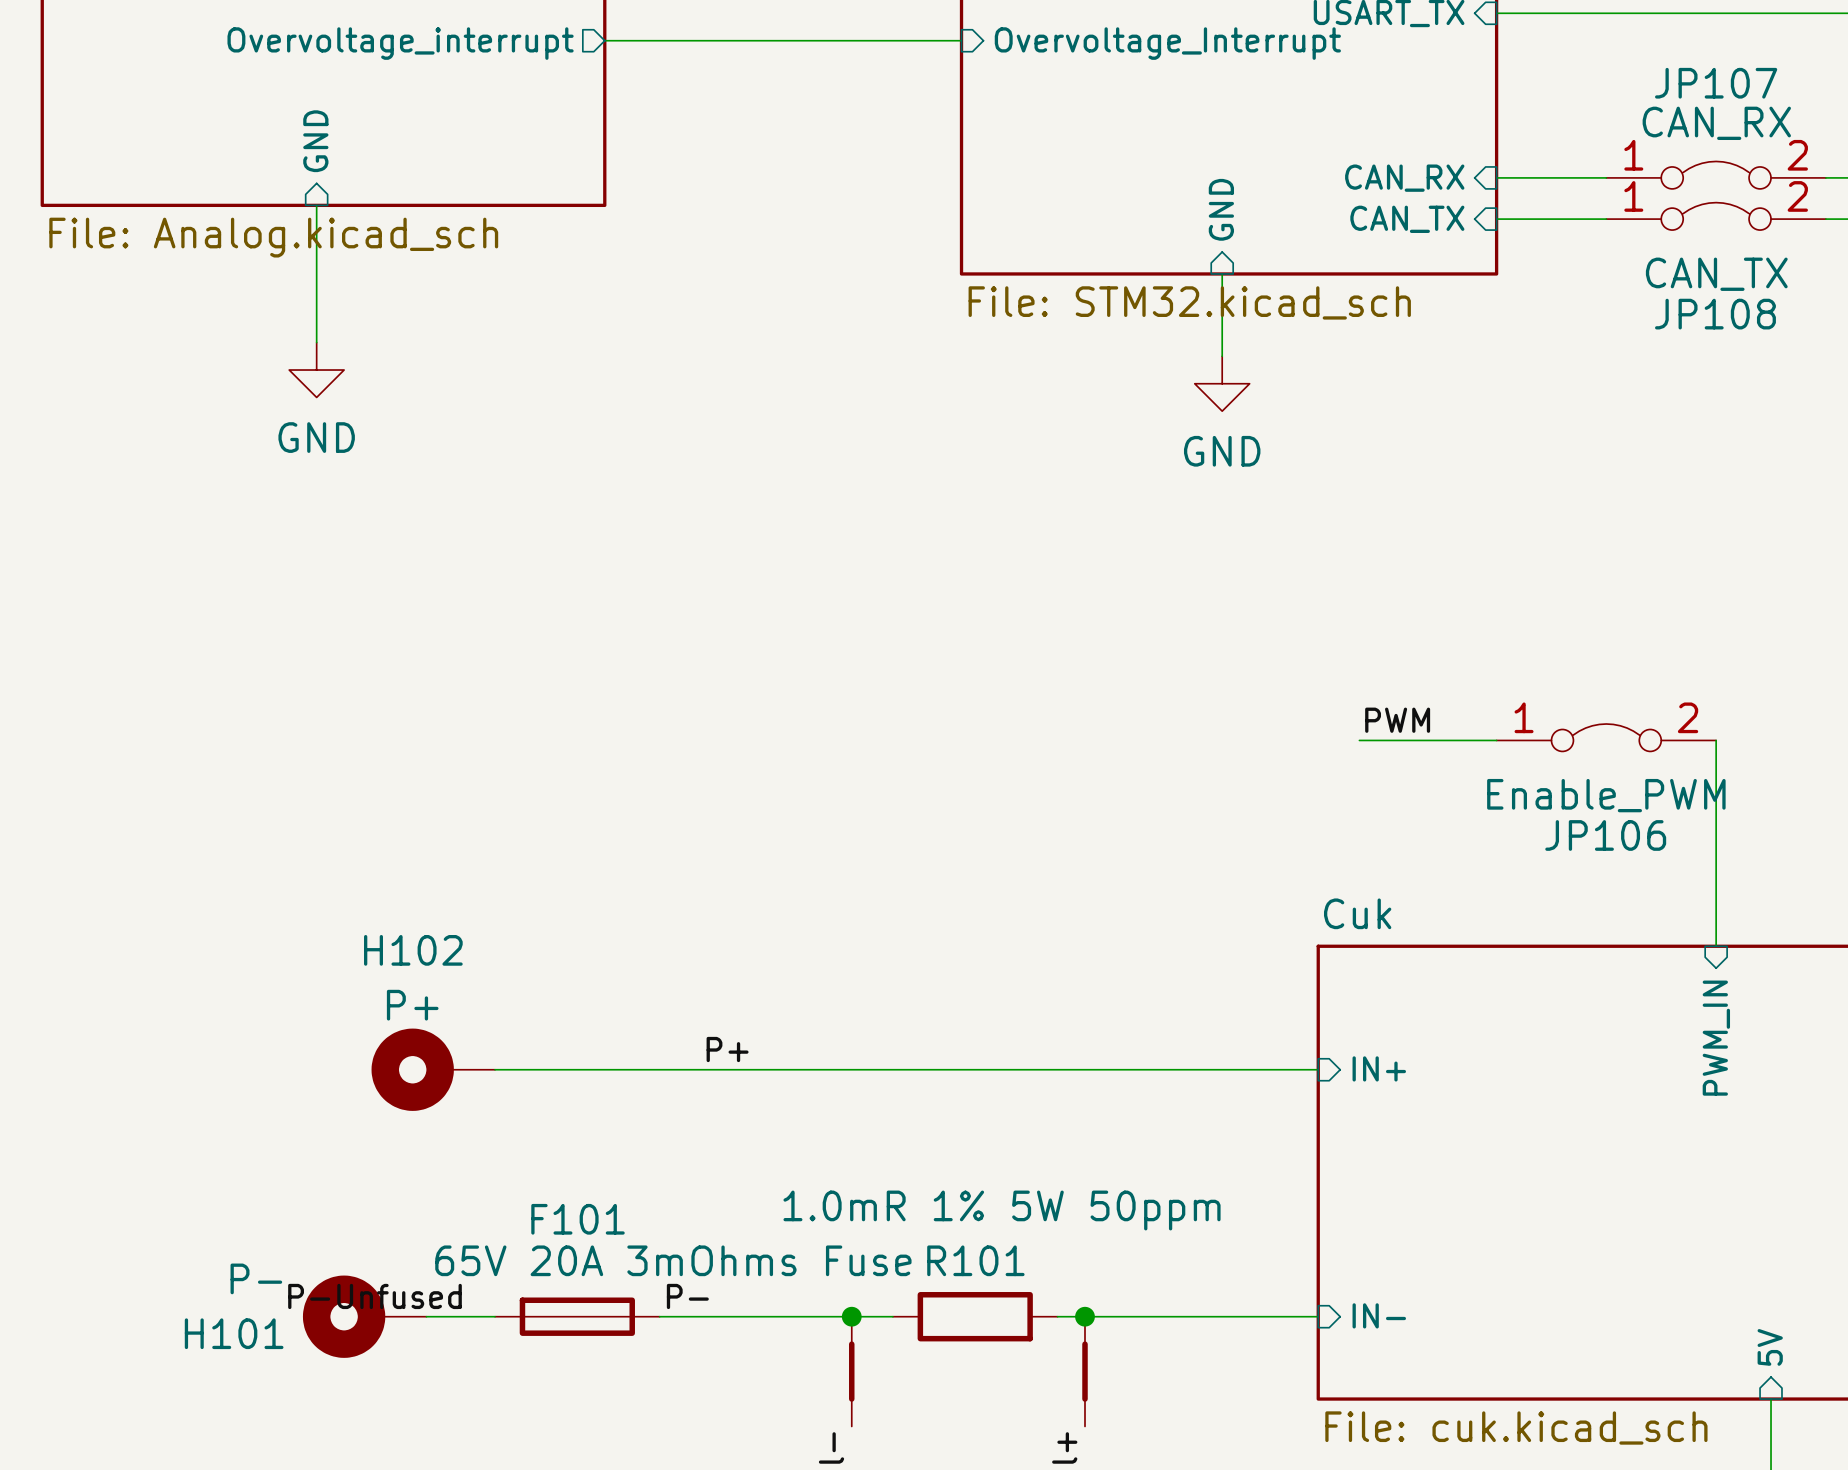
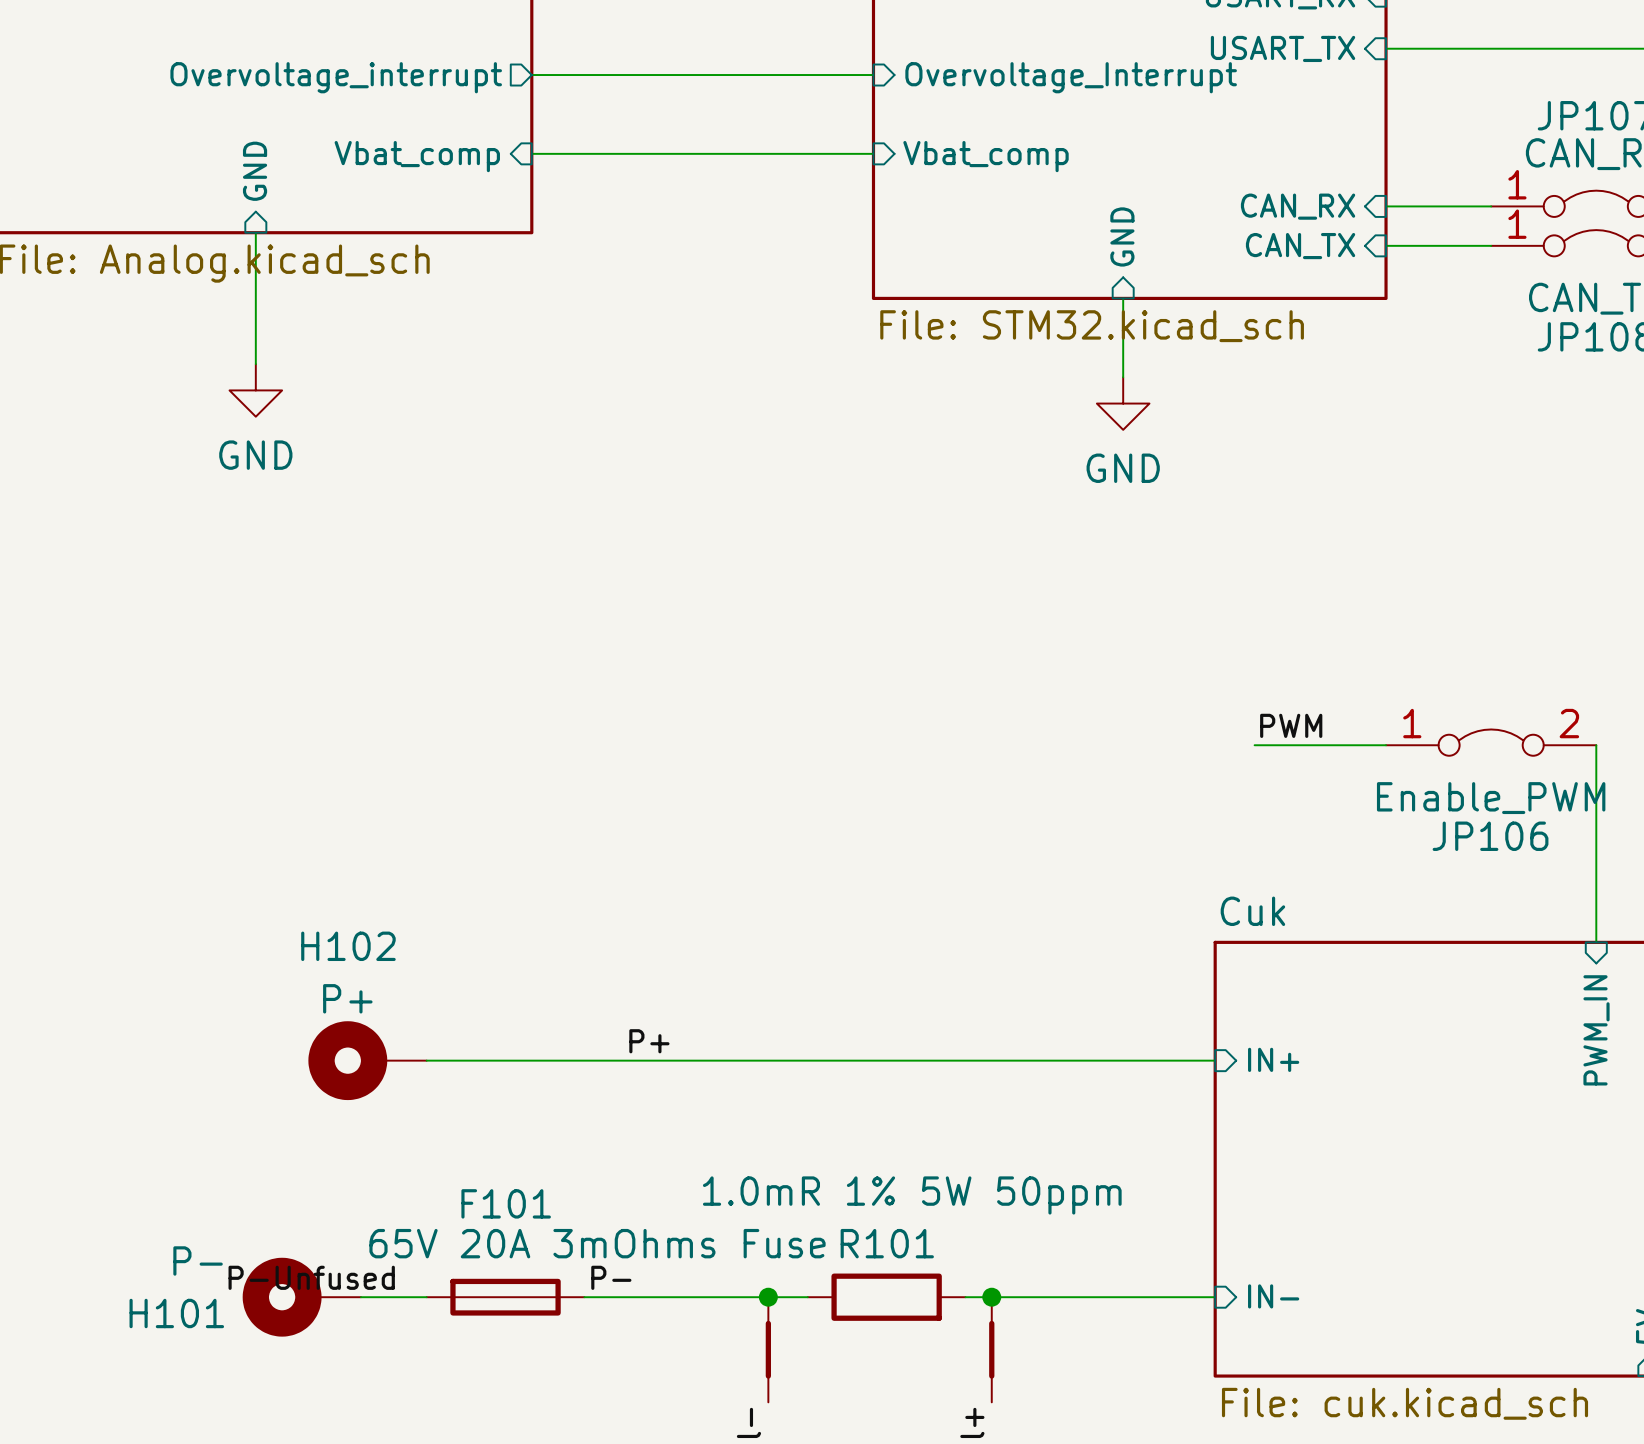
wire: none -> (531, 153) (873, 153)
sheet pin: none -> Vbat_comp (417, 156)
sheet pin: none -> Vbat_comp (986, 156)

